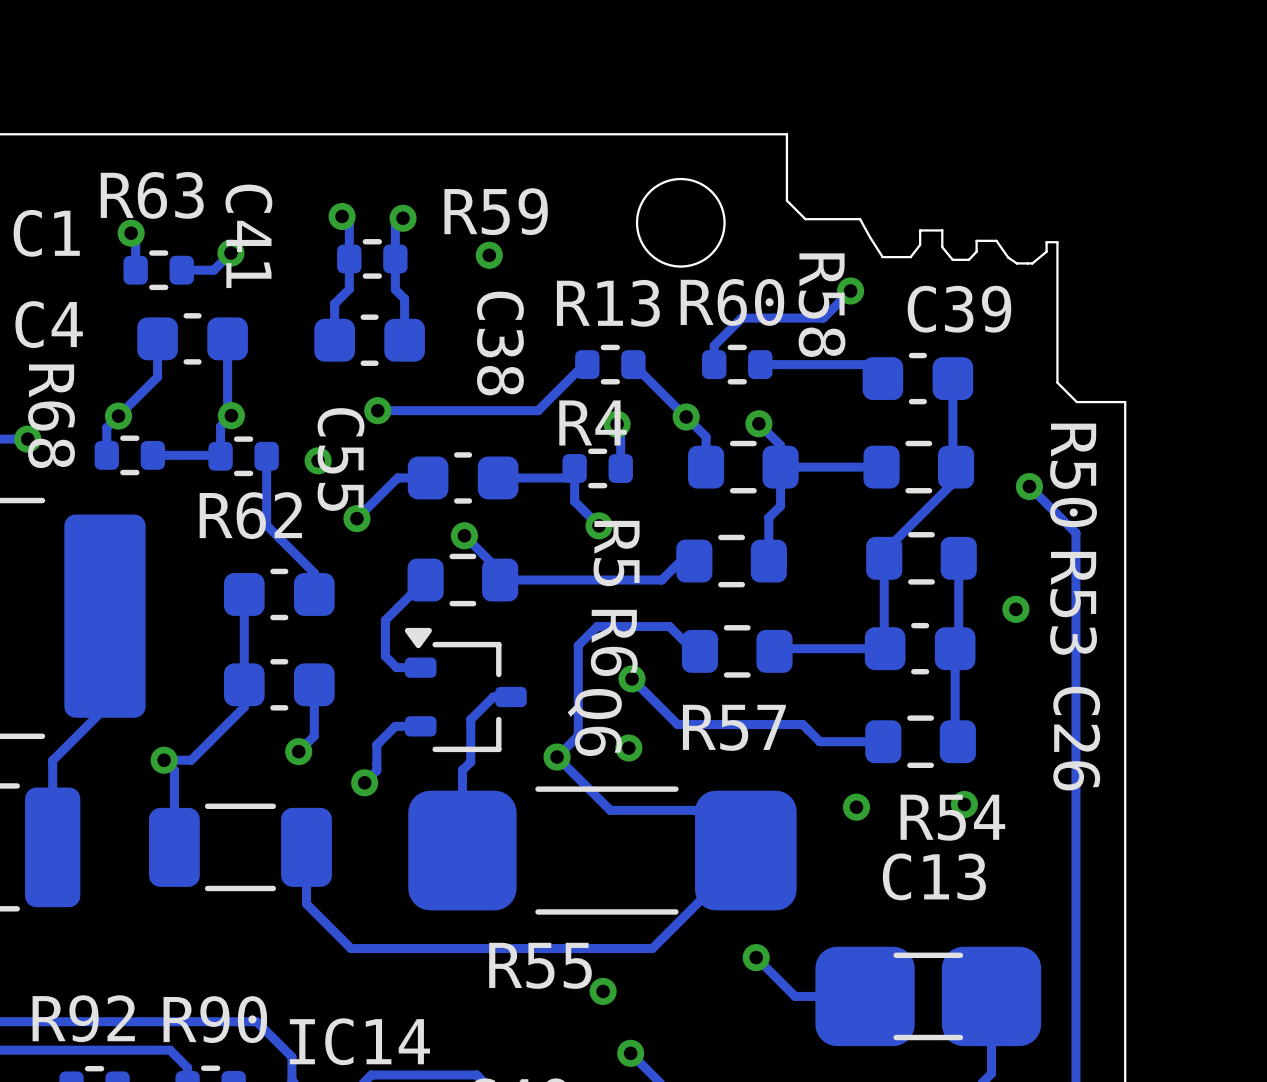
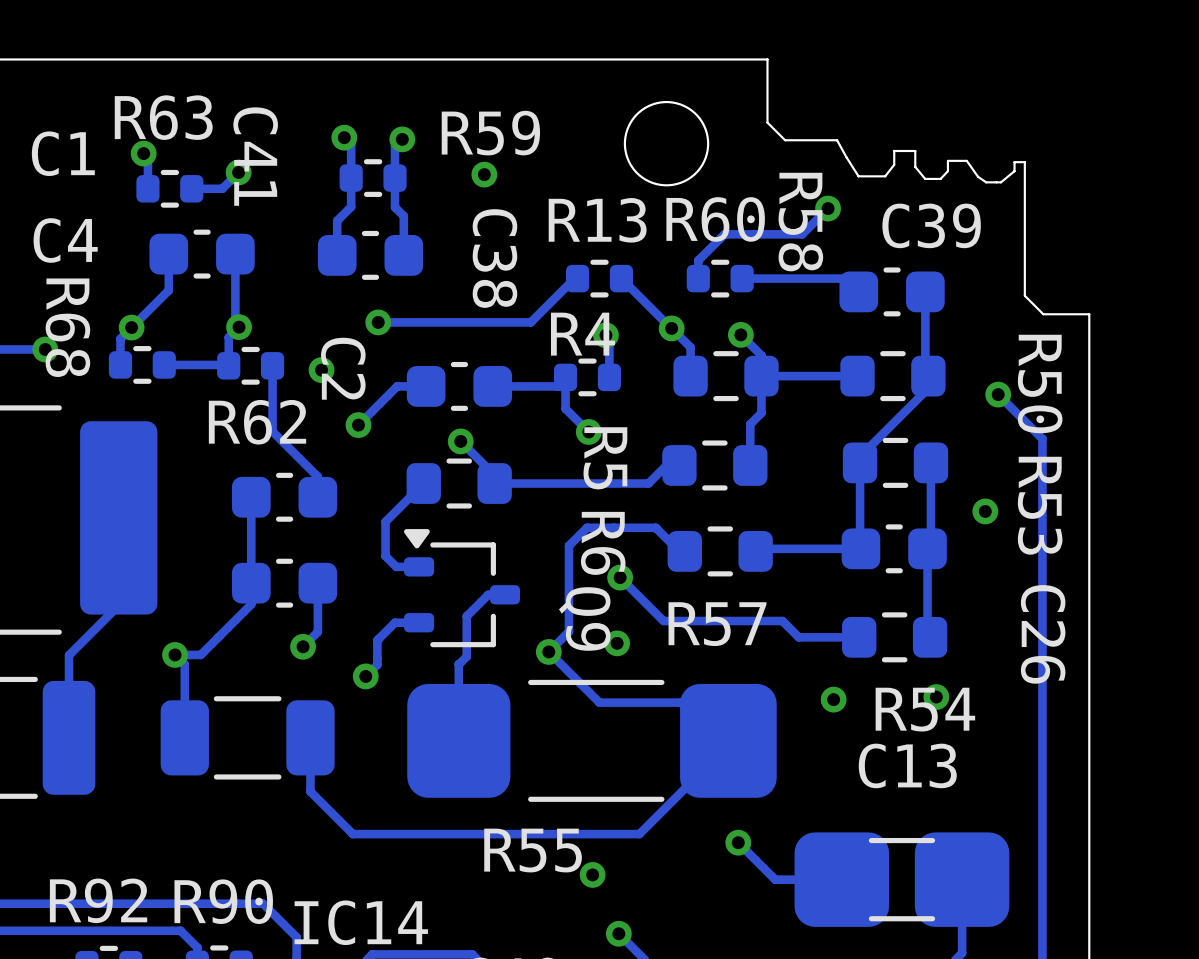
C55 name: C55 (341, 459) -> C2 (343, 368)
Q6 name: Q6 (594, 722) -> Q9 (584, 618)

